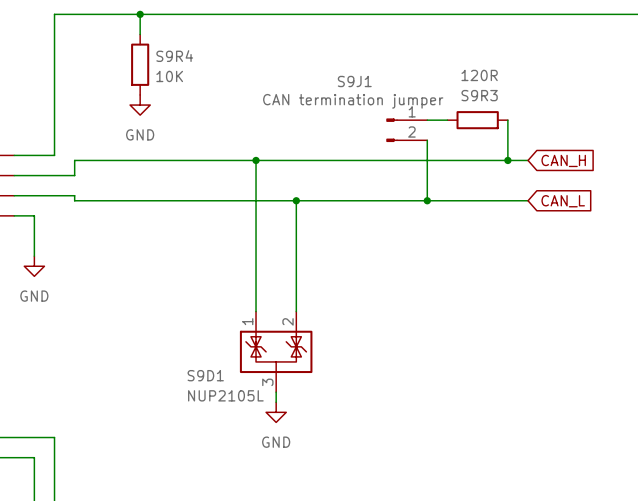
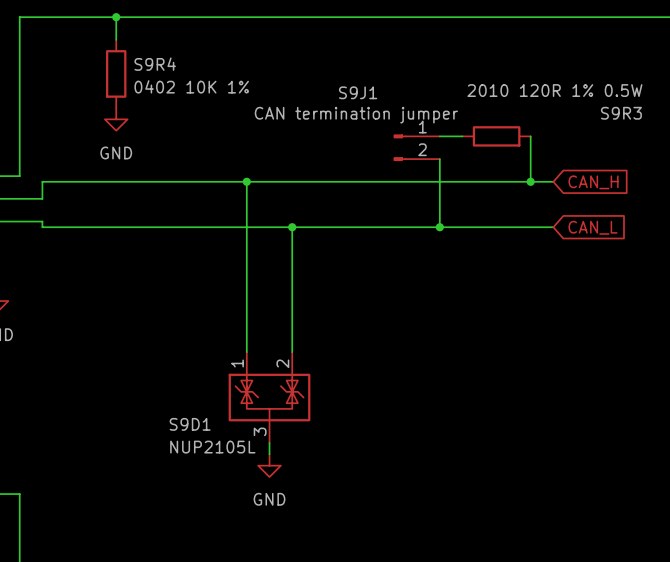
S9R3 value: 120R (479, 75) -> 2010 120R 1% 0.5W (554, 90)
S9R4 value: 10K (169, 76) -> 0402 10K 1% (191, 86)
S9R3 name position: S9R3 (479, 95) -> S9R3 (621, 113)

